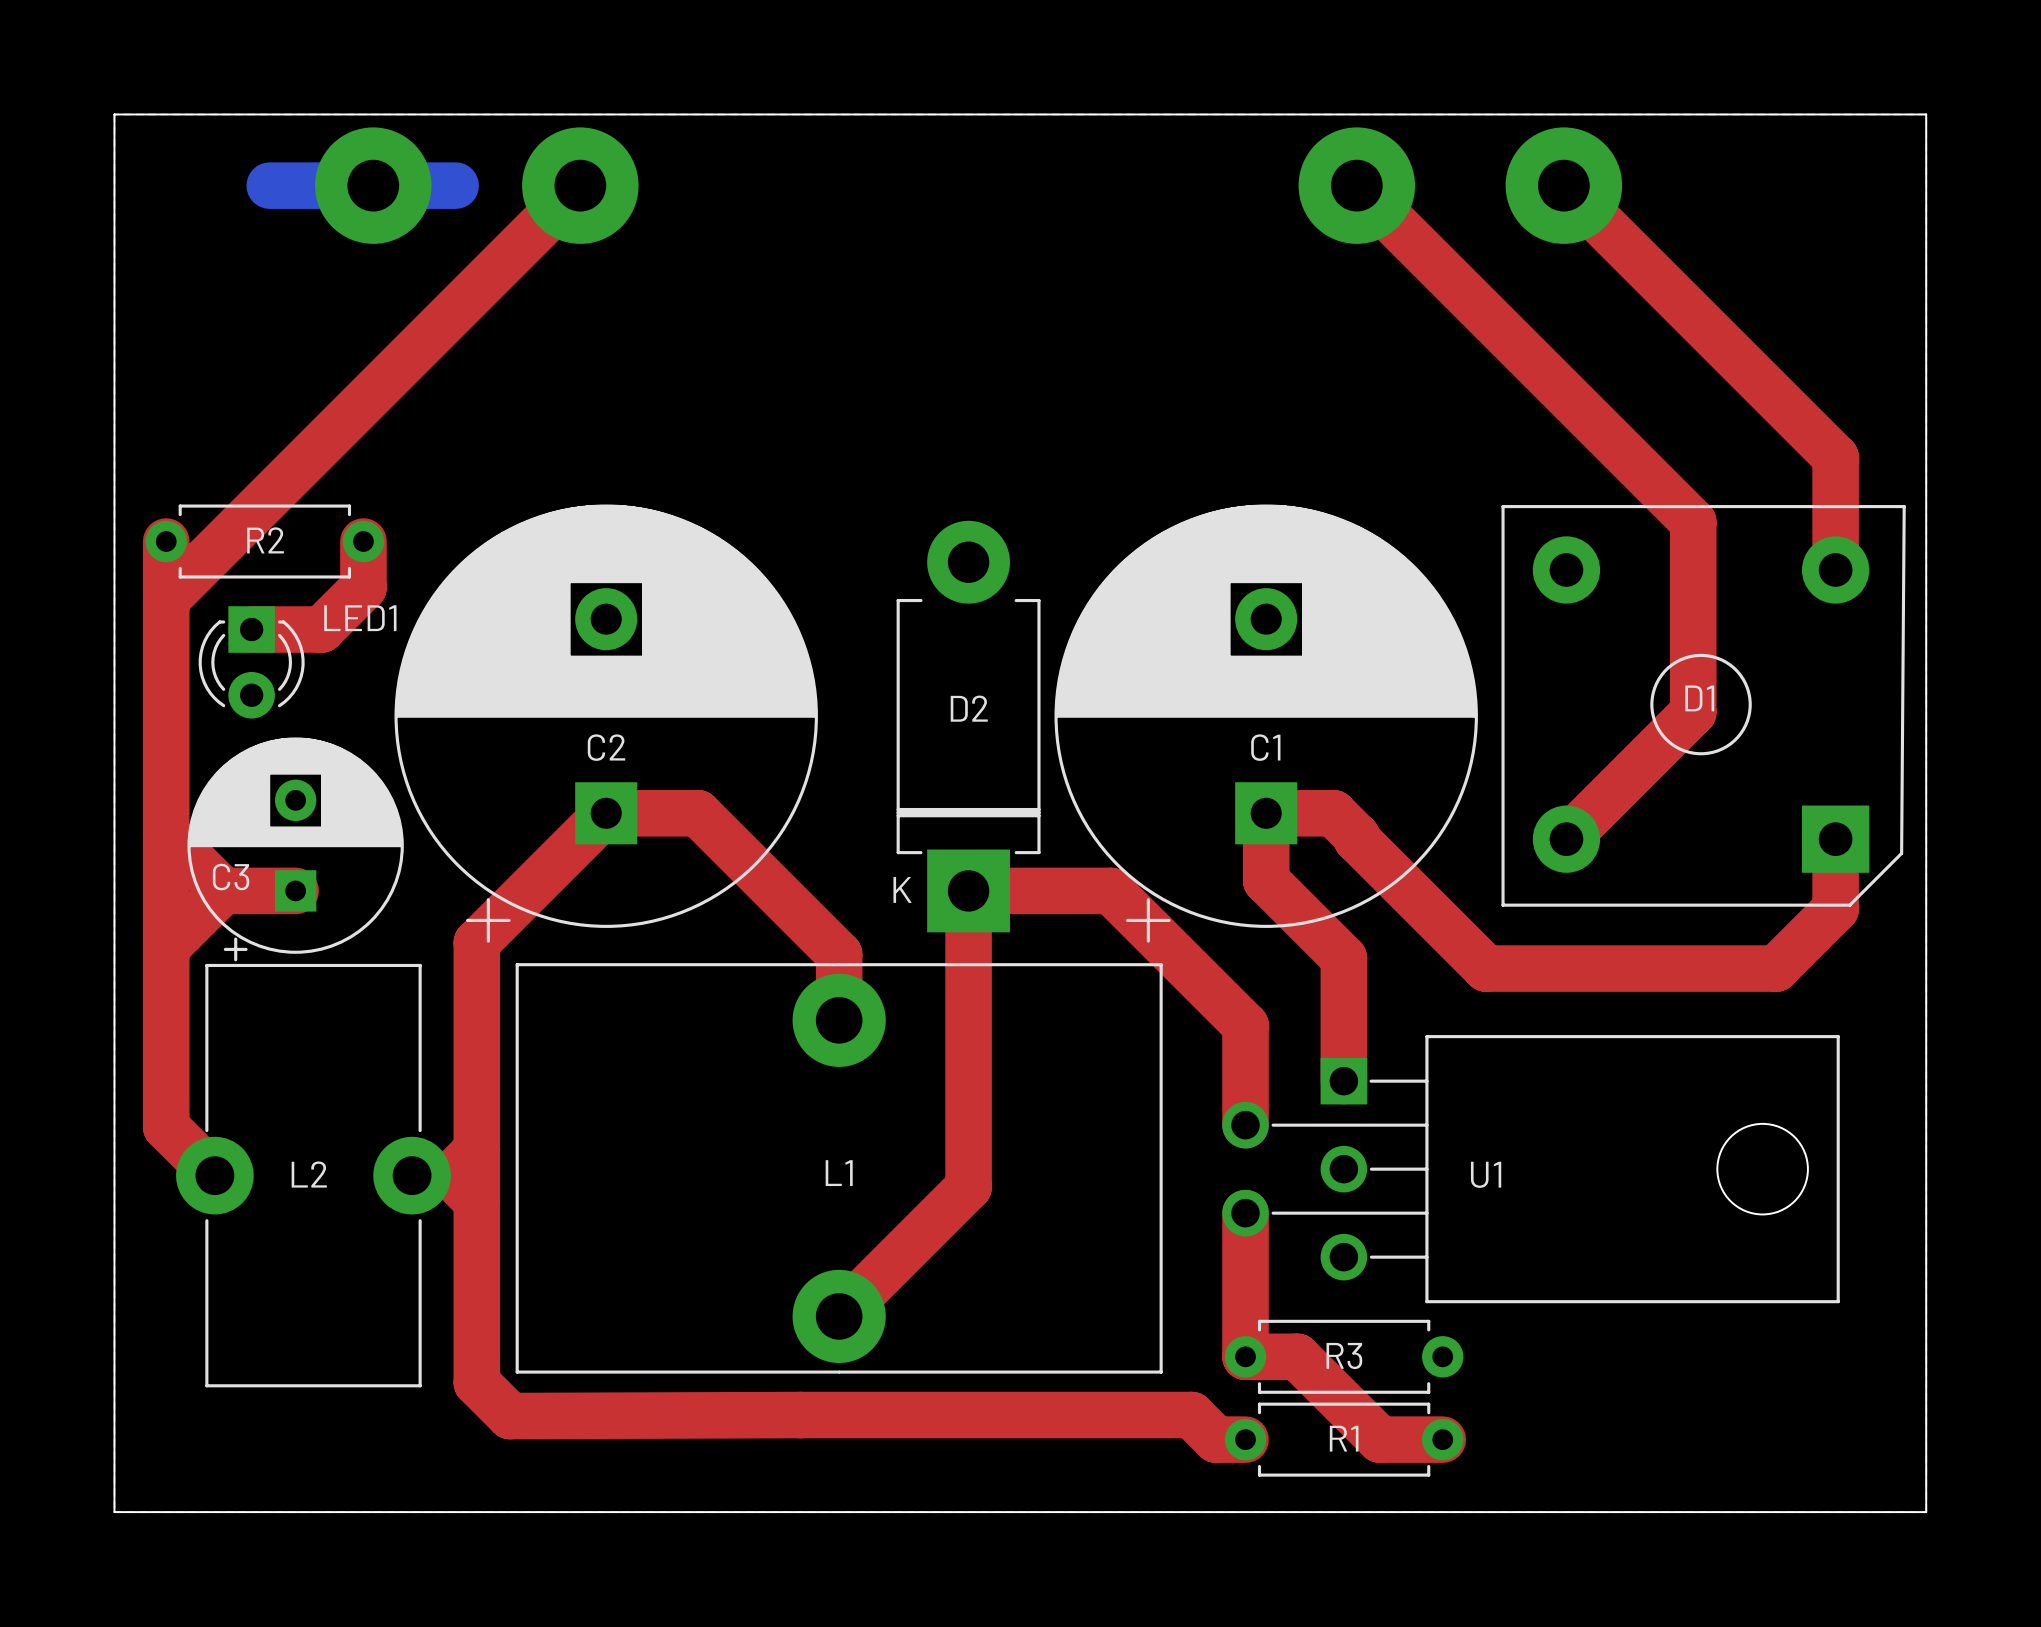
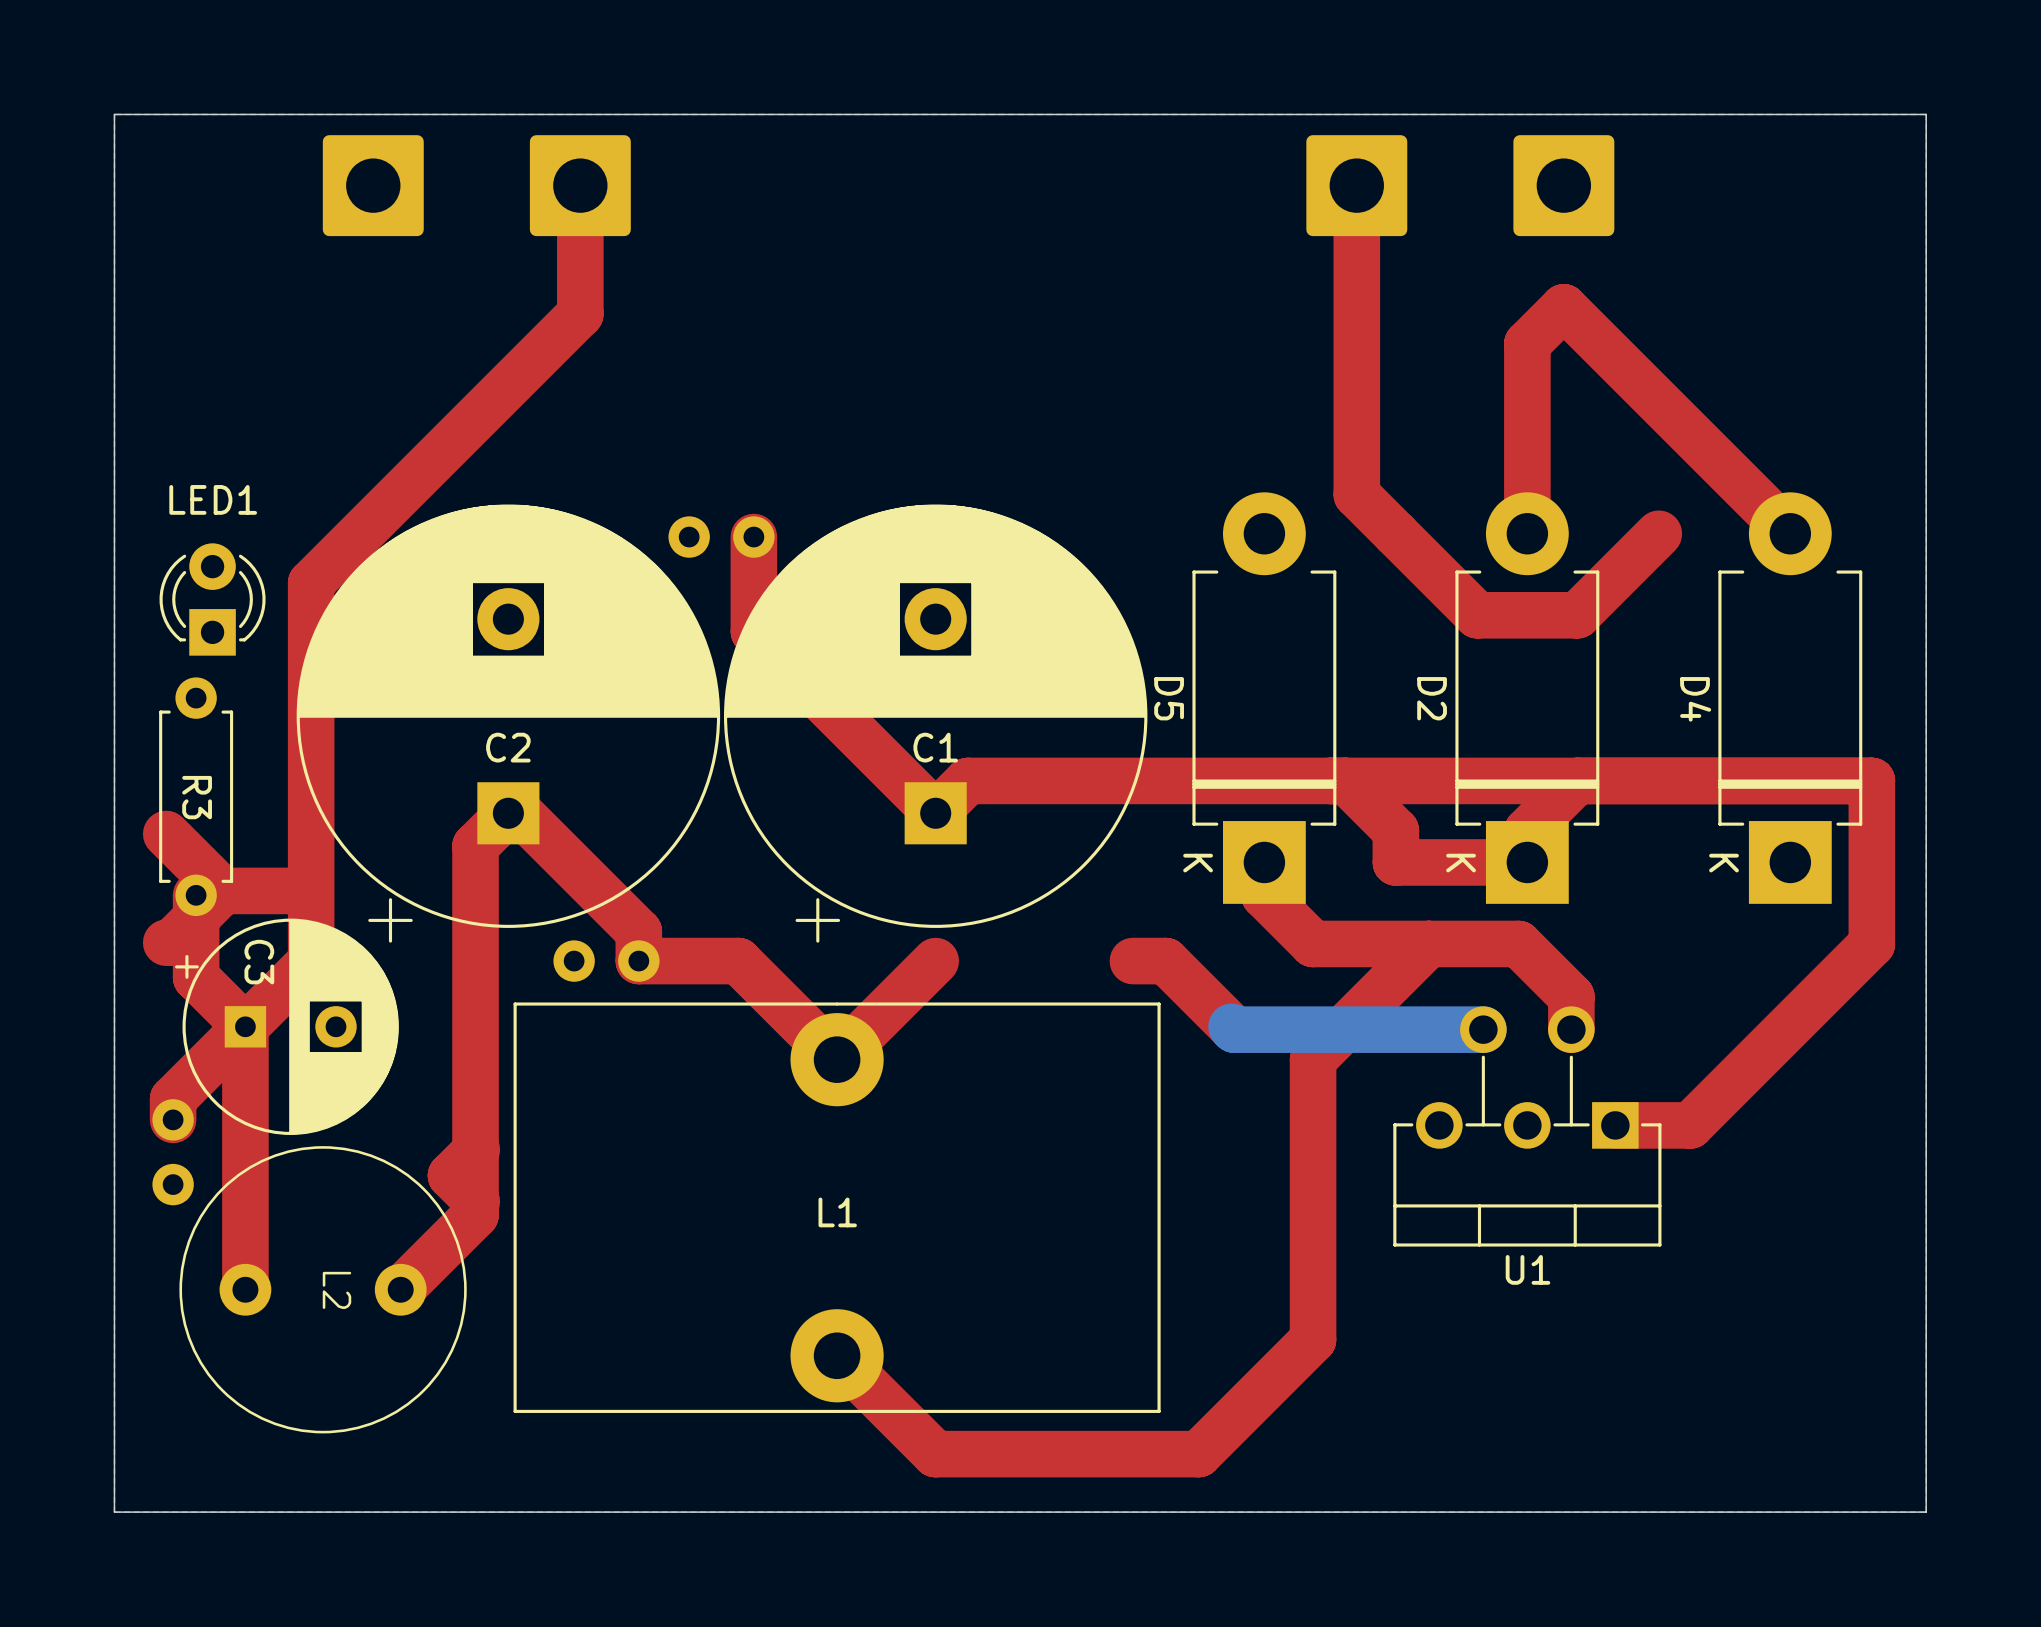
part footprint: [315, 127, 432, 244] -> [322, 135, 424, 237]
part footprint: [522, 127, 639, 244] -> [529, 135, 631, 237]
part footprint: [1298, 127, 1416, 244] -> [1306, 135, 1408, 237]
part footprint: [1505, 127, 1623, 244] -> [1513, 135, 1615, 237]
bottom track: (455, 185) (269, 185) -> none
top track: (580, 185) (166, 599) -> (580, 185) (580, 313) (311, 583) (311, 961) (173, 1099) (173, 1119)
top track: (1356, 185) (1693, 522) (1693, 712) (1566, 839) -> (1356, 185) (1356, 494) (1477, 615) (1577, 615) (1658, 533)
top track: (1563, 185) (1835, 457) (1835, 569) -> none
top track: none -> (1790, 533) (1563, 307) (1527, 343) (1527, 533)
part: none -> (721, 537)
top track: none -> (753, 537) (753, 631) (935, 813) (968, 780) (1871, 780) (1871, 943) (1690, 1125) (1615, 1125)
top track: (166, 541) (166, 1126) (214, 1175) (201, 1175) -> none
R2: (264, 541) -> none
top track: (363, 541) (363, 587) (321, 629) (251, 629) -> none
LED1 name position: LED1 (360, 618) -> LED1 (213, 499)
LED1 rotation: 0° (251, 662) -> 180° (212, 599)
LED1 position: (251, 662) -> (212, 599)
D5: none -> (1264, 698)
D4: none -> (1790, 698)
D1: (1703, 705) -> none
D2 name rotation: 0° (969, 708) -> 90° clockwise (1432, 698)
D2 name position: D2 (969, 708) -> D2 (1432, 698)
C2 position: (606, 723) -> (508, 723)
C1 position: (1266, 723) -> (935, 723)
D2 position: (968, 726) -> (1527, 698)
top track: none -> (1577, 780) (1527, 830) (1527, 862) (1395, 862) (1395, 830) (1345, 780)
top track: (1835, 839) (1835, 909) (1776, 968) (1486, 968) (1356, 839) (1356, 836) (1333, 813) (1266, 813) (1266, 880) (1343, 958) (1343, 1081) -> none
C3 rotation: 0° (295, 849) -> 90° clockwise (286, 1026)
C3 position: (295, 849) -> (286, 1026)
top track: none -> (1264, 862) (1264, 895) (1313, 943) (1518, 943) (1571, 996) (1571, 1029)
top track: none -> (196, 895) (196, 977) (245, 1026) (245, 1289)
top track: none -> (1428, 943) (1313, 1059) (1313, 1339) (1198, 1454) (935, 1454) (837, 1355)
part: none -> (606, 961)
top track: none -> (935, 961) (837, 1059) (738, 961) (638, 961) (638, 931) (520, 813) (508, 813) (475, 846) (475, 1214) (400, 1289)
top track: none -> (1132, 961) (1165, 961) (1231, 1026)
L2 footprint: [176, 963, 451, 1388] -> [179, 1146, 467, 1434]
top track: (839, 1020) (839, 954) (697, 813) (606, 813) (476, 942) (476, 1382) (510, 1416) (1191, 1415) (1216, 1439) (1245, 1439) -> none
bottom track: none -> (1231, 1026) (1234, 1029) (1483, 1029)
U1 footprint: [1222, 1035, 1840, 1304] -> [1393, 1006, 1662, 1247]
top track: (1245, 1125) (1245, 1025) (1110, 890) (968, 890) (968, 1187) (839, 1316) -> none
part: none -> (173, 1152)
L1 position: (839, 1168) -> (837, 1207)
U1 name position: U1 (1486, 1174) -> U1 (1527, 1269)
top track: (1245, 1213) (1245, 1356) (1297, 1356) (1380, 1439) (1442, 1439) -> none
R3 rotation: 0° (1344, 1356) -> 90° clockwise (196, 796)
R3 position: (1344, 1356) -> (196, 796)
R1: (1344, 1439) -> none

